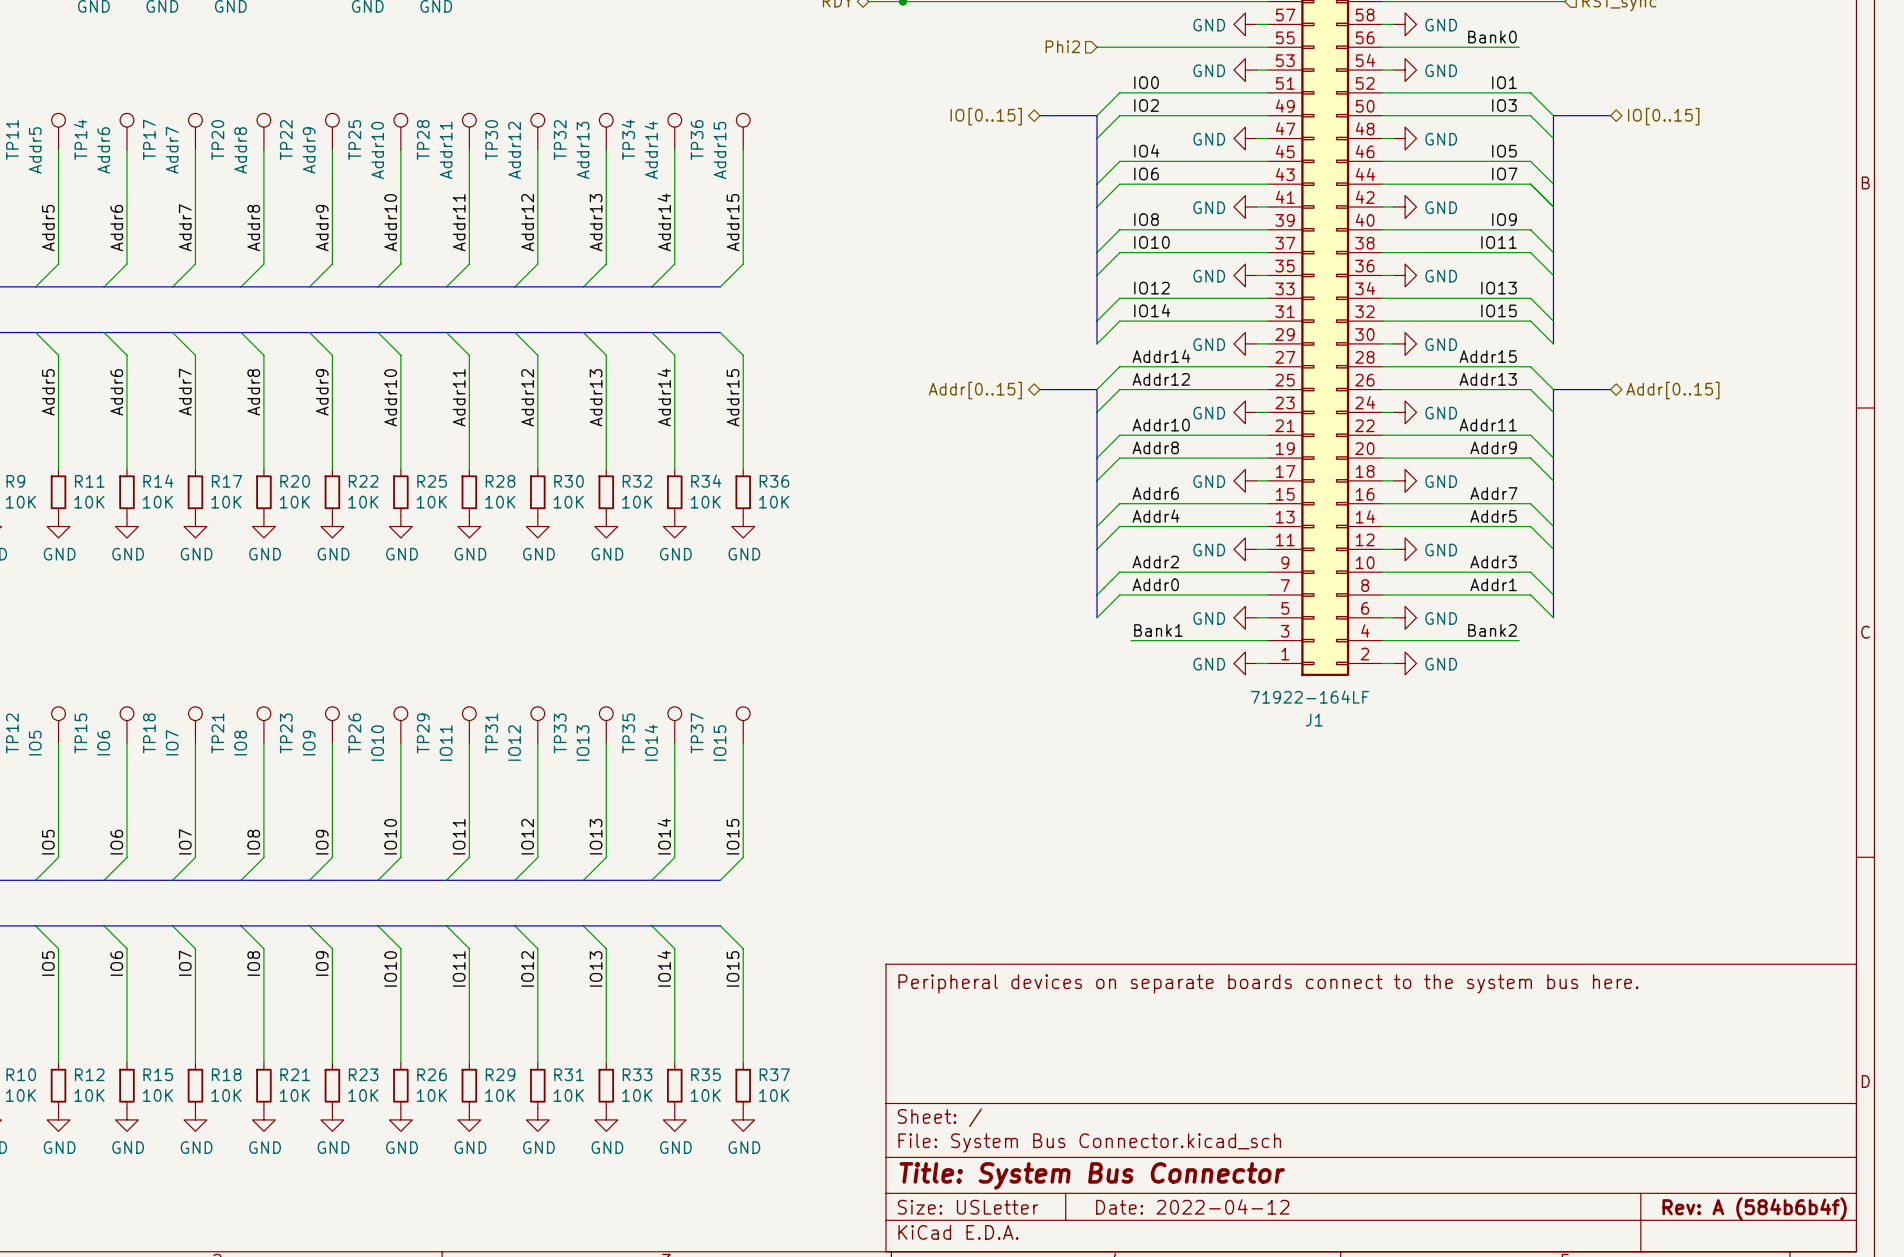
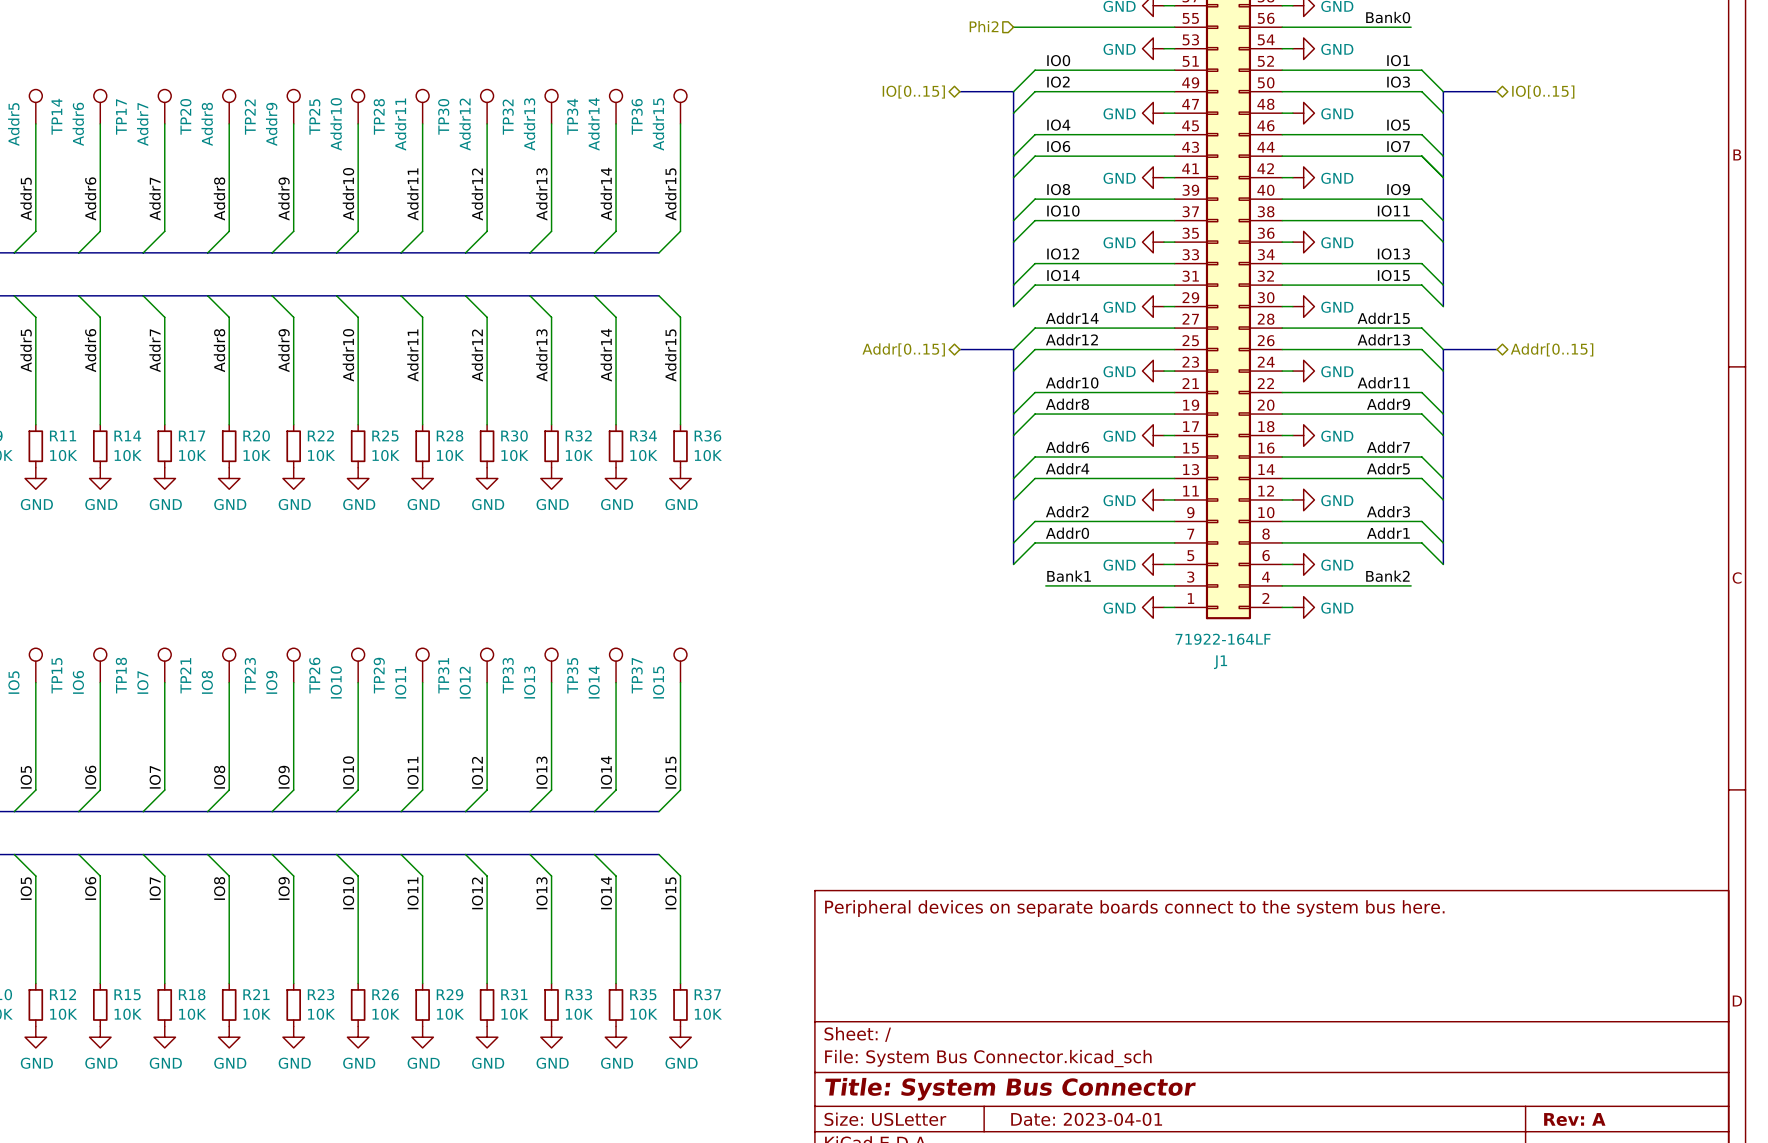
title block: Date: 2022-04-12 (1192, 1206) -> Date: 2023-04-01 (1086, 1119)
title block: Rev: A (584b6b4f) (1754, 1208) -> Rev: A (1574, 1119)

